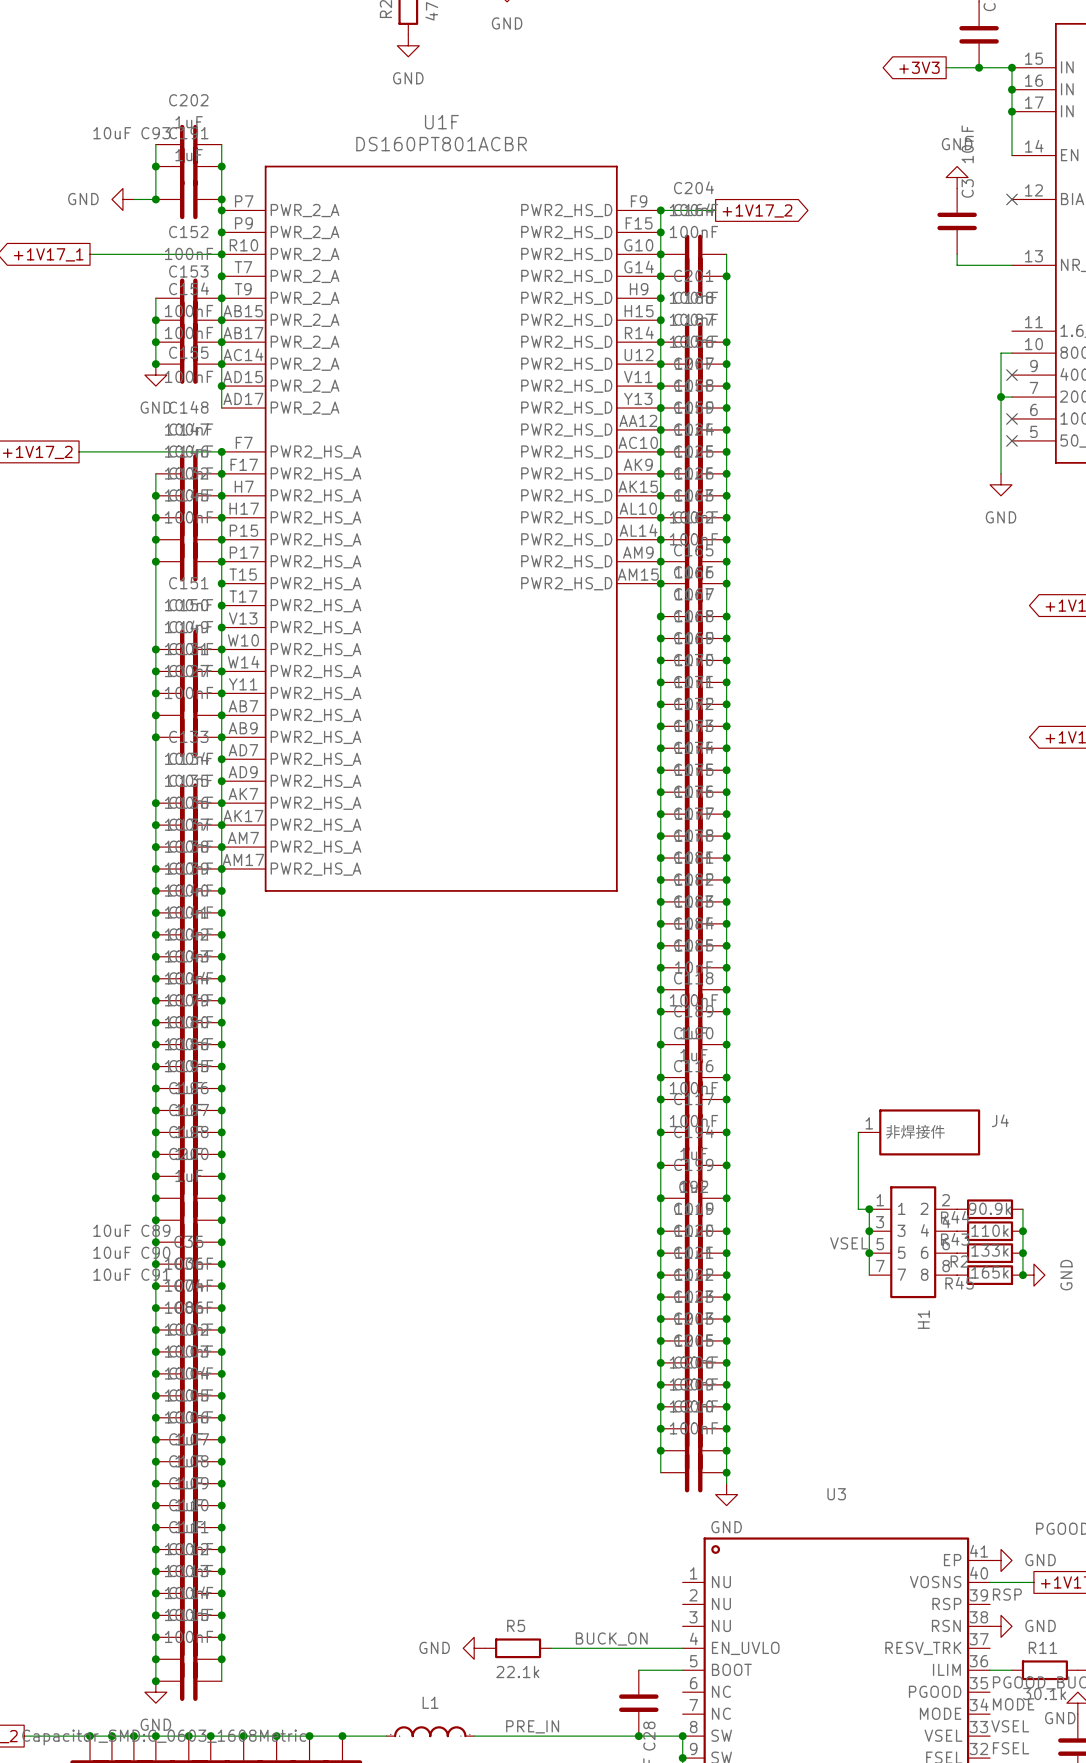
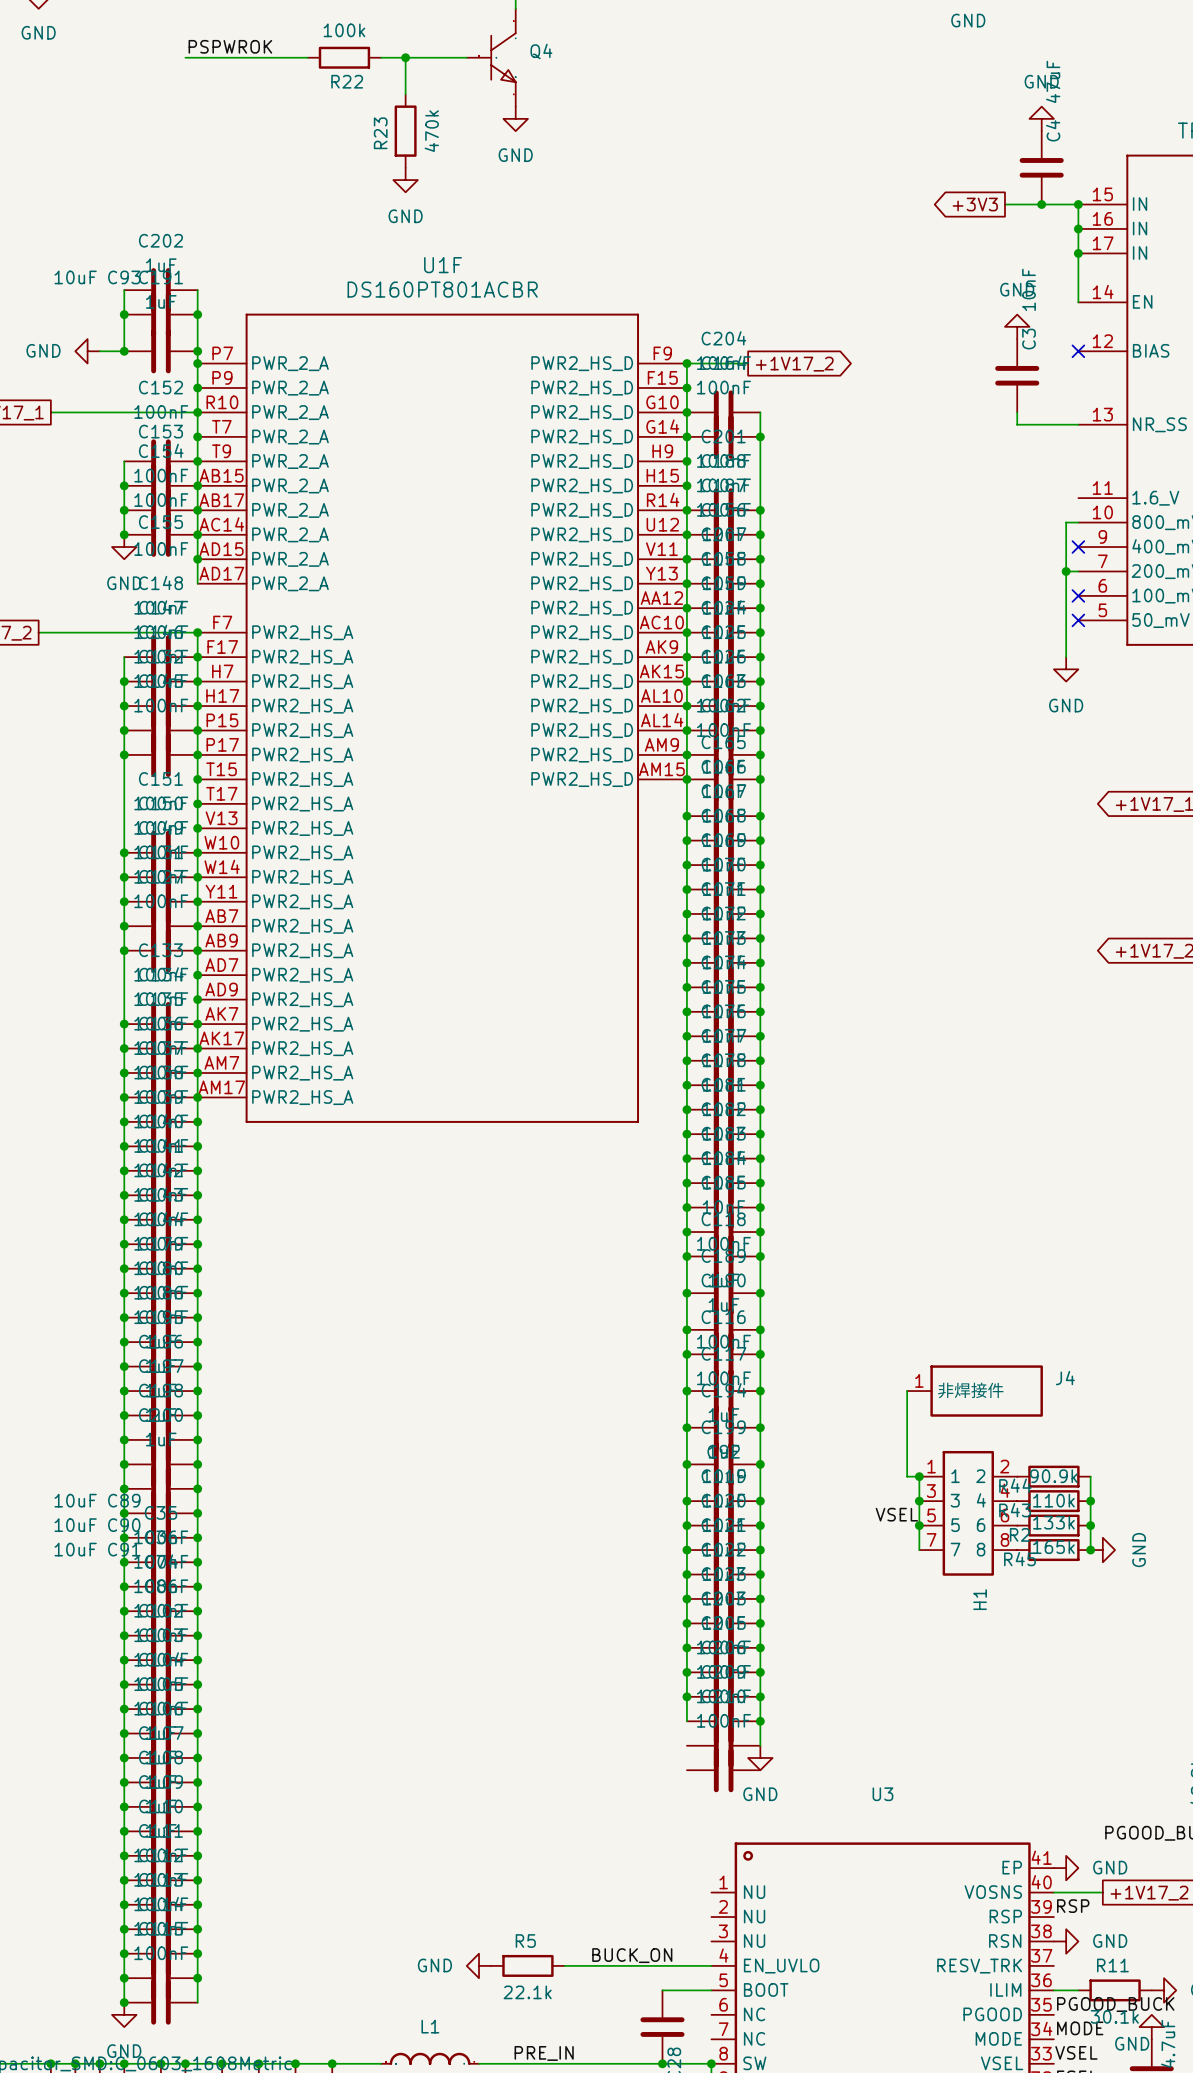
wire: (660, 1428) (660, 1472) -> none
junction: (660, 1428) -> none
junction: (660, 1450) -> none
wire: (726, 1450) (726, 1483) -> none
junction: (726, 1450) -> none
junction: (726, 1472) -> none
power symbol position: GND (726, 1494) -> GND (760, 1757)

